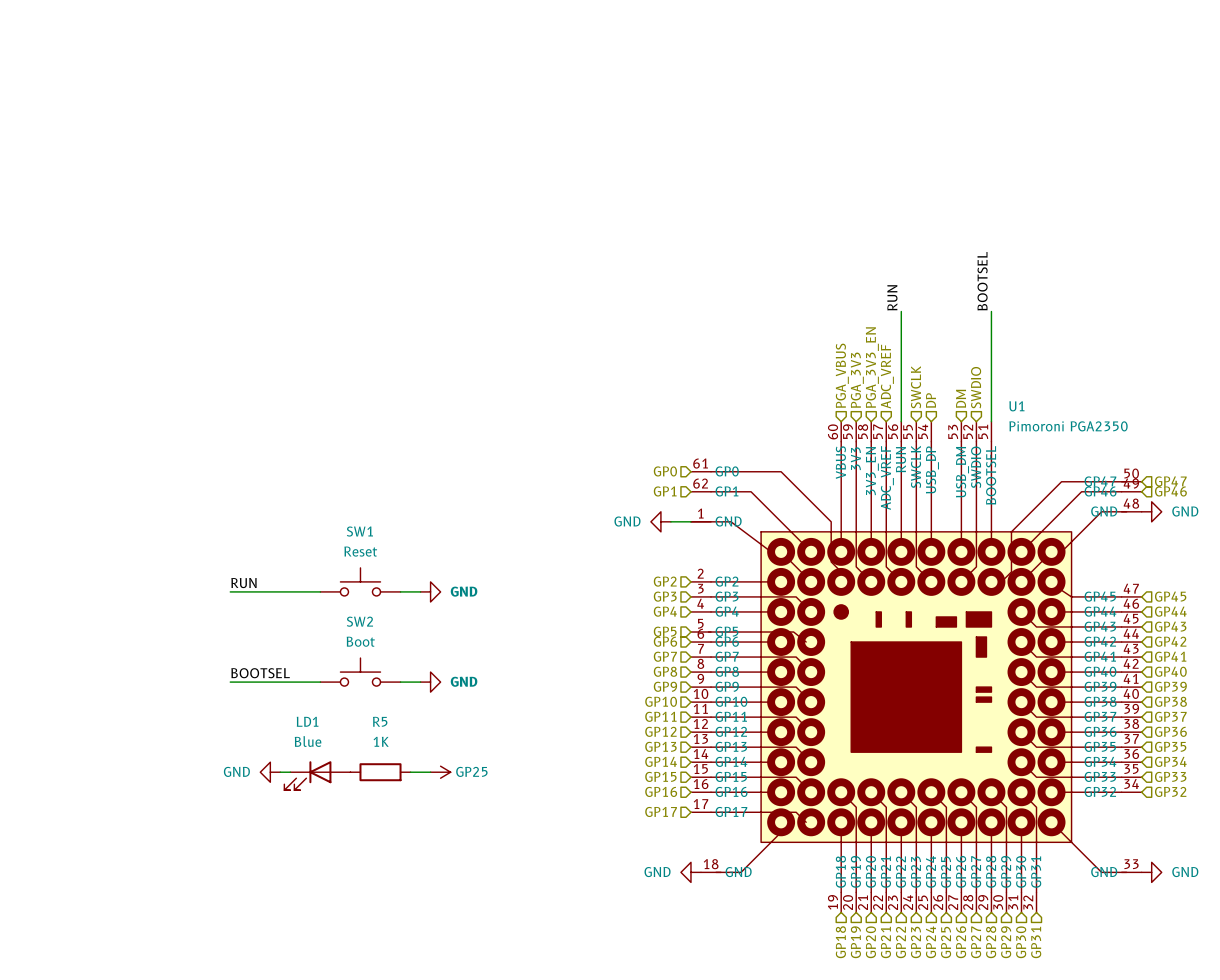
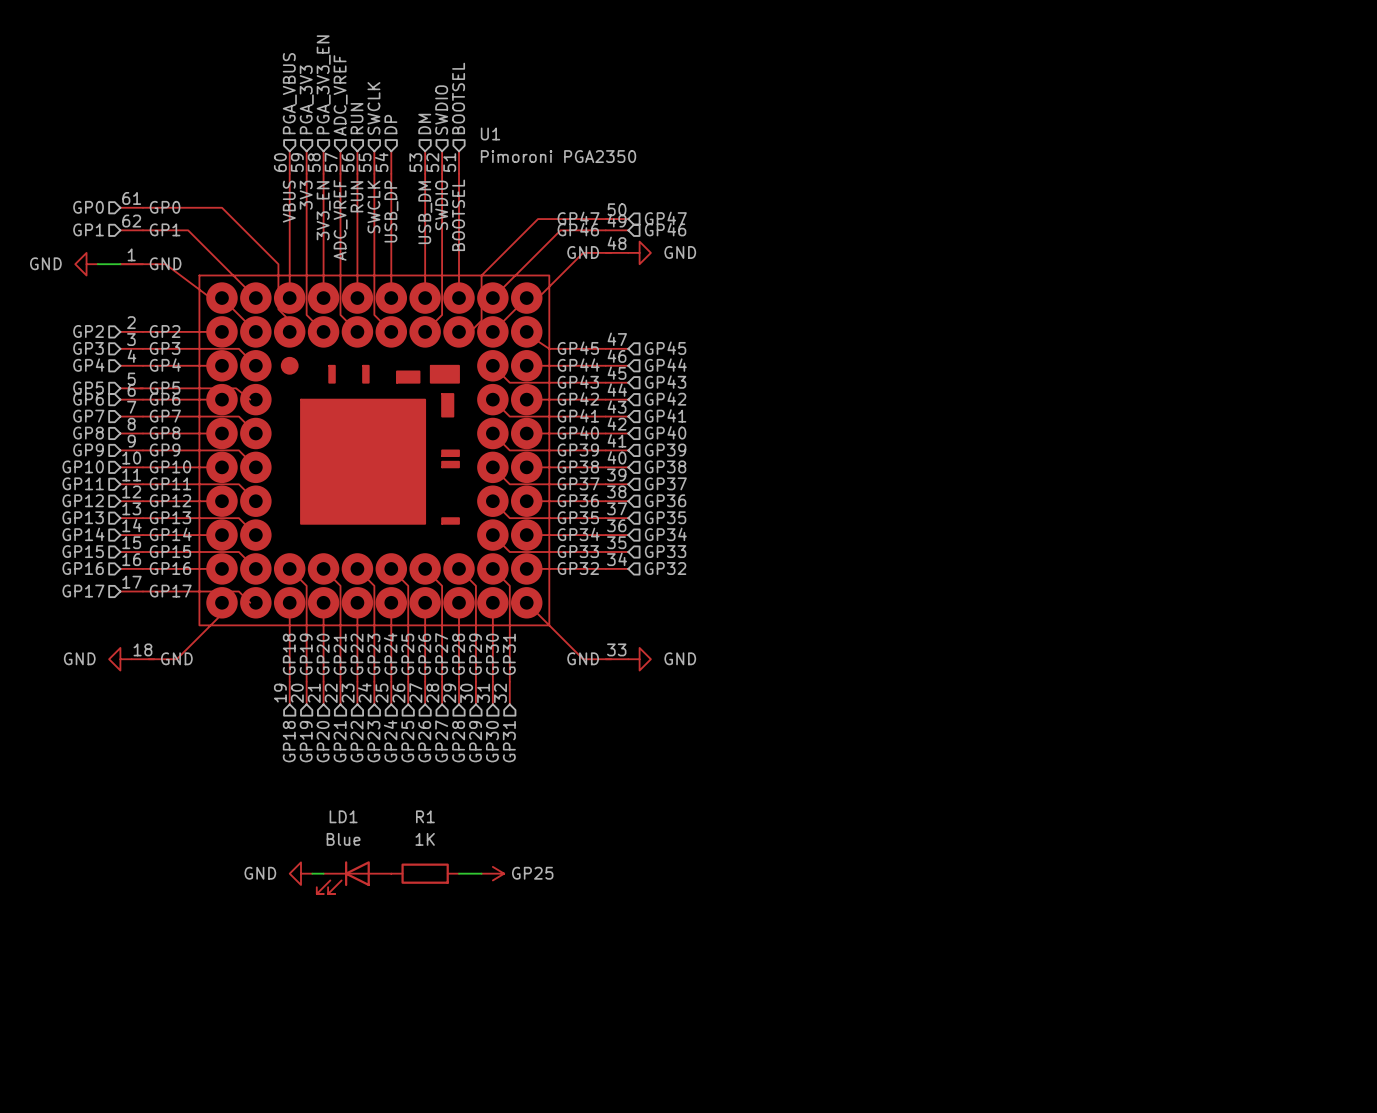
hierarchical label: none -> PGA_3V3_EN (323, 84)
hierarchical label: none -> PGA_VBUS (289, 93)
hierarchical label: none -> ADC_VREF (340, 95)
hierarchical label: none -> BOOTSEL (458, 98)
hierarchical label: none -> PGA_3V3 (306, 99)
hierarchical label: none -> SWCLK (373, 108)
hierarchical label: none -> SWDIO (441, 110)
hierarchical label: none -> RUN (357, 118)
hierarchical label: none -> DM (424, 124)
hierarchical label: none -> DP (390, 124)
hierarchical label: none -> GP0 (88, 207)
hierarchical label: none -> GP47 (665, 218)
hierarchical label: none -> GP1 (88, 229)
hierarchical label: none -> GP46 (665, 229)
power symbol: none -> GND (639, 252)
power symbol: none -> GND (86, 264)
wire: none -> (97, 264) (120, 264)
label: BOOTSEL (982, 281) -> none
hierarchical label: none -> GP2 (88, 331)
label: RUN (892, 297) -> none
hierarchical label: none -> GP3 (88, 348)
hierarchical label: none -> GP45 (665, 348)
wire: (901, 311) (901, 421) -> none
wire: (991, 311) (991, 421) -> none
hierarchical label: none -> GP4 (88, 365)
hierarchical label: none -> GP44 (665, 365)
hierarchical label: none -> GP43 (665, 382)
hierarchical label: none -> GP5 (88, 387)
hierarchical label: none -> GP6 (88, 399)
hierarchical label: none -> GP42 (665, 398)
hierarchical label: none -> GP7 (88, 416)
hierarchical label: none -> GP41 (665, 415)
hierarchical label: PGA_3V3_EN (872, 367) -> none
hierarchical label: PGA_VBUS (842, 375) -> none
hierarchical label: ADC_VREF (887, 376) -> none
hierarchical label: PGA_3V3 (857, 380) -> none
hierarchical label: none -> GP8 (88, 433)
hierarchical label: none -> GP40 (665, 432)
hierarchical label: SWCLK (916, 387) -> none
hierarchical label: SWDIO (976, 387) -> none
hierarchical label: none -> GP9 (88, 450)
hierarchical label: none -> GP39 (665, 450)
hierarchical label: DM (961, 398) -> none
hierarchical label: DP (931, 400) -> none
hierarchical label: none -> GP10 (83, 466)
hierarchical label: none -> GP38 (665, 466)
hierarchical label: none -> GP11 (83, 483)
hierarchical label: none -> GP37 (665, 483)
hierarchical label: none -> GP12 (83, 500)
hierarchical label: none -> GP36 (665, 500)
hierarchical label: none -> GP13 (83, 517)
hierarchical label: none -> GP35 (665, 517)
hierarchical label: none -> GP14 (83, 534)
hierarchical label: none -> GP34 (665, 534)
hierarchical label: GP0 (665, 471) -> none
hierarchical label: GP47 (1170, 481) -> none
hierarchical label: none -> GP15 (83, 551)
hierarchical label: none -> GP33 (665, 551)
hierarchical label: GP1 (665, 491) -> none
hierarchical label: GP46 (1170, 491) -> none
hierarchical label: none -> GP16 (83, 568)
hierarchical label: none -> GP32 (665, 568)
power symbol: GND (1151, 511) -> none
hierarchical label: none -> GP17 (83, 591)
power symbol: GND (660, 521) -> none
wire: (670, 521) (690, 521) -> none
power symbol: none -> GND (120, 659)
SW1: Reset (360, 581) -> none
power symbol: none -> GND (639, 659)
hierarchical label: GP2 (665, 581) -> none
label: RUN (243, 583) -> none
wire: (230, 591) (320, 591) -> none
wire: (400, 591) (420, 591) -> none
power symbol: GND (430, 591) -> none
hierarchical label: GP3 (665, 596) -> none
hierarchical label: GP45 (1170, 596) -> none
hierarchical label: GP4 (665, 611) -> none
hierarchical label: GP44 (1170, 611) -> none
hierarchical label: GP43 (1170, 626) -> none
hierarchical label: GP5 (665, 631) -> none
hierarchical label: GP6 (665, 641) -> none
hierarchical label: GP42 (1170, 641) -> none
hierarchical label: none -> GP18 (289, 741)
hierarchical label: none -> GP19 (306, 741)
hierarchical label: none -> GP20 (323, 741)
hierarchical label: none -> GP24 (390, 741)
hierarchical label: none -> GP26 (424, 741)
hierarchical label: none -> GP27 (441, 741)
hierarchical label: none -> GP28 (458, 741)
hierarchical label: none -> GP29 (475, 741)
hierarchical label: none -> GP30 (492, 741)
hierarchical label: none -> GP21 (340, 741)
hierarchical label: none -> GP22 (357, 741)
hierarchical label: none -> GP23 (373, 741)
hierarchical label: none -> GP25 (407, 741)
hierarchical label: none -> GP31 (509, 741)
hierarchical label: GP7 (665, 656) -> none
hierarchical label: GP41 (1170, 656) -> none
U1 position: (916, 667) -> (374, 427)
hierarchical label: GP8 (665, 671) -> none
hierarchical label: GP40 (1170, 671) -> none
SW2: Boot (360, 672) -> none
label: BOOTSEL (260, 673) -> none
wire: (230, 682) (320, 682) -> none
wire: (400, 682) (420, 682) -> none
power symbol: GND (430, 682) -> none
hierarchical label: GP9 (665, 686) -> none
hierarchical label: GP39 (1170, 686) -> none
hierarchical label: GP10 (661, 701) -> none
hierarchical label: GP38 (1170, 701) -> none
hierarchical label: GP11 (660, 716) -> none
hierarchical label: GP37 (1170, 716) -> none
R5 name: R5 (380, 721) -> R1 (425, 816)
hierarchical label: GP12 (660, 731) -> none
hierarchical label: GP36 (1170, 731) -> none
hierarchical label: GP13 (660, 746) -> none
hierarchical label: GP35 (1170, 746) -> none
hierarchical label: GP14 (661, 761) -> none
hierarchical label: GP34 (1170, 761) -> none
hierarchical label: GP15 (660, 776) -> none
hierarchical label: GP33 (1170, 776) -> none
hierarchical label: GP16 (661, 791) -> none
hierarchical label: GP32 (1170, 791) -> none
hierarchical label: GP17 (661, 811) -> none
power symbol: GND (690, 872) -> none
power symbol: GND (1151, 872) -> none
hierarchical label: GP18 (840, 942) -> none
hierarchical label: GP19 (855, 942) -> none
hierarchical label: GP20 (870, 942) -> none
hierarchical label: GP21 (885, 942) -> none
hierarchical label: GP22 (900, 942) -> none
hierarchical label: GP23 (916, 942) -> none
hierarchical label: GP24 (931, 942) -> none
hierarchical label: GP25 (946, 942) -> none
hierarchical label: GP26 (961, 942) -> none
hierarchical label: GP27 (976, 942) -> none
hierarchical label: GP28 (991, 942) -> none
hierarchical label: GP29 (1006, 942) -> none
hierarchical label: GP30 (1021, 942) -> none
hierarchical label: GP31 (1036, 942) -> none

